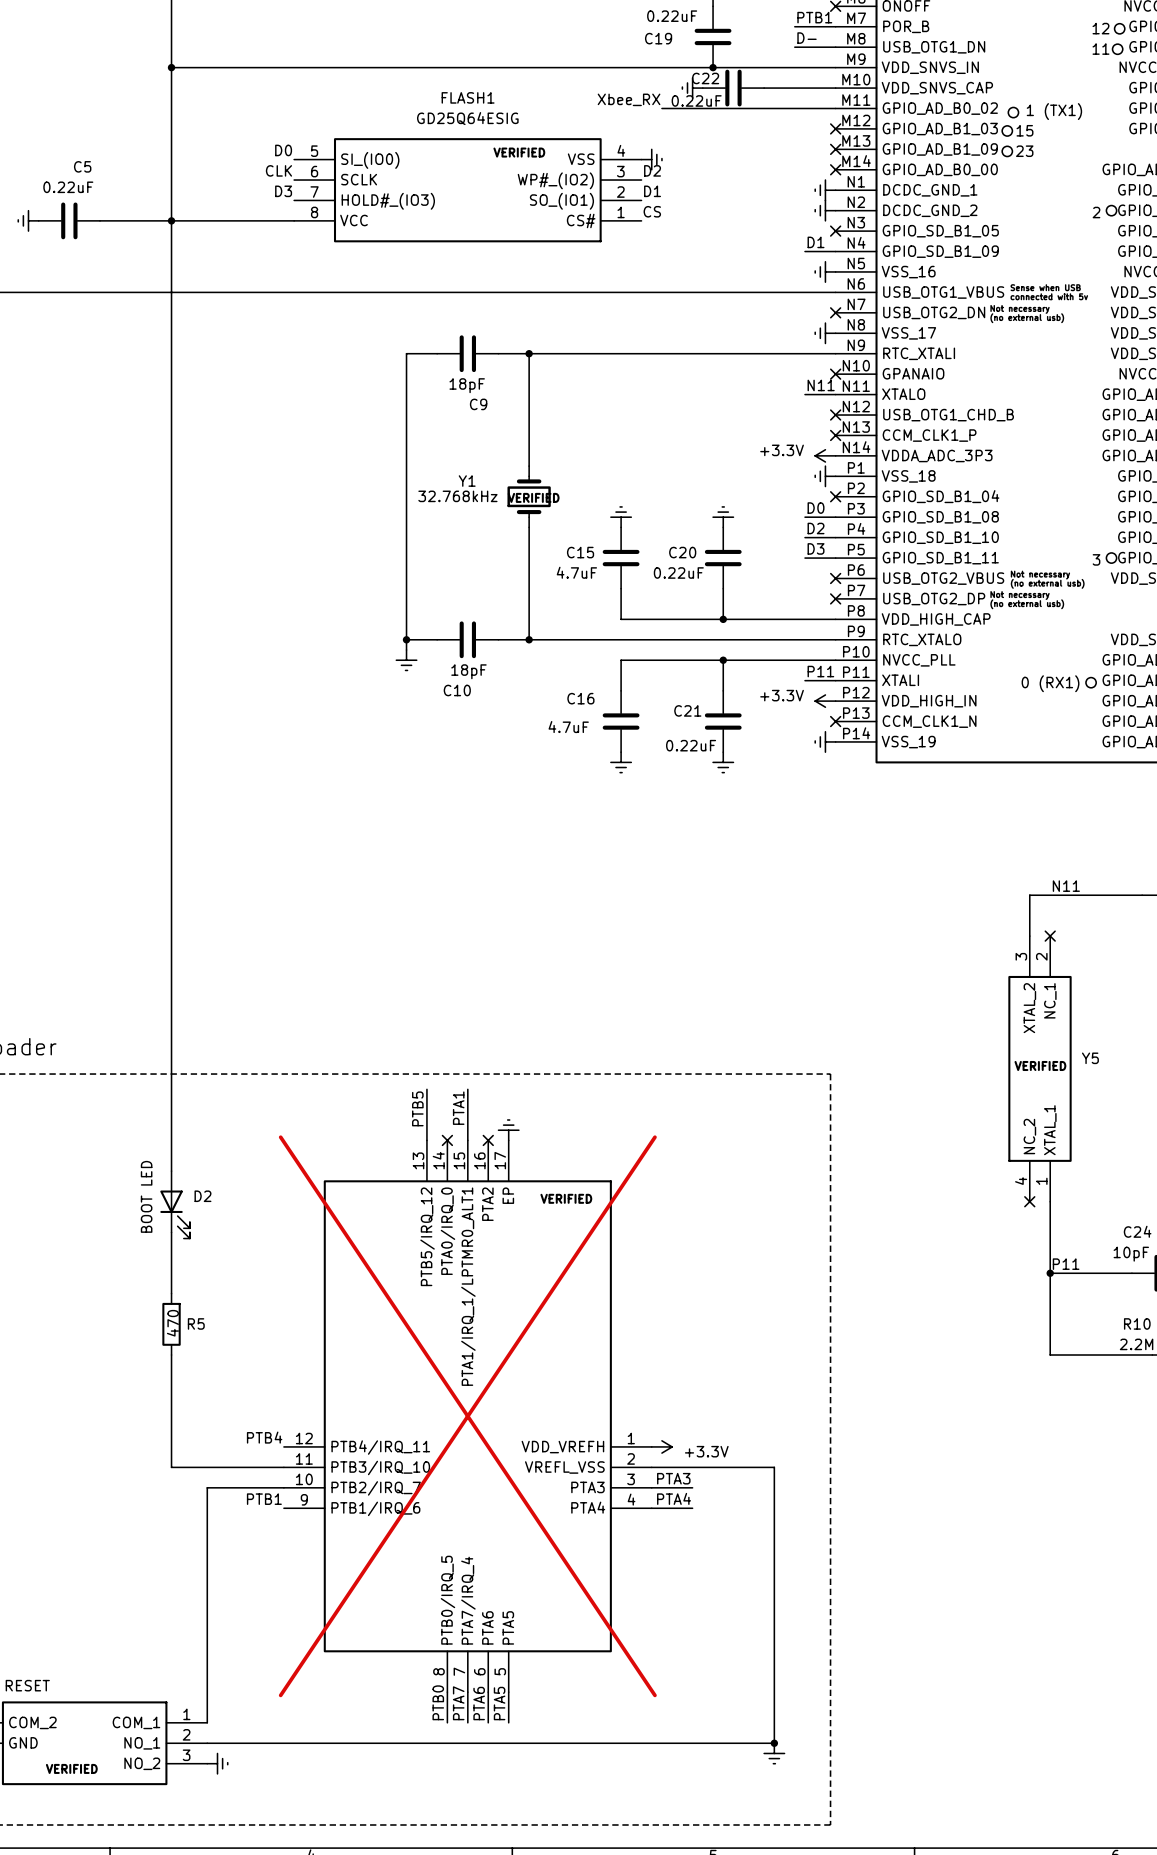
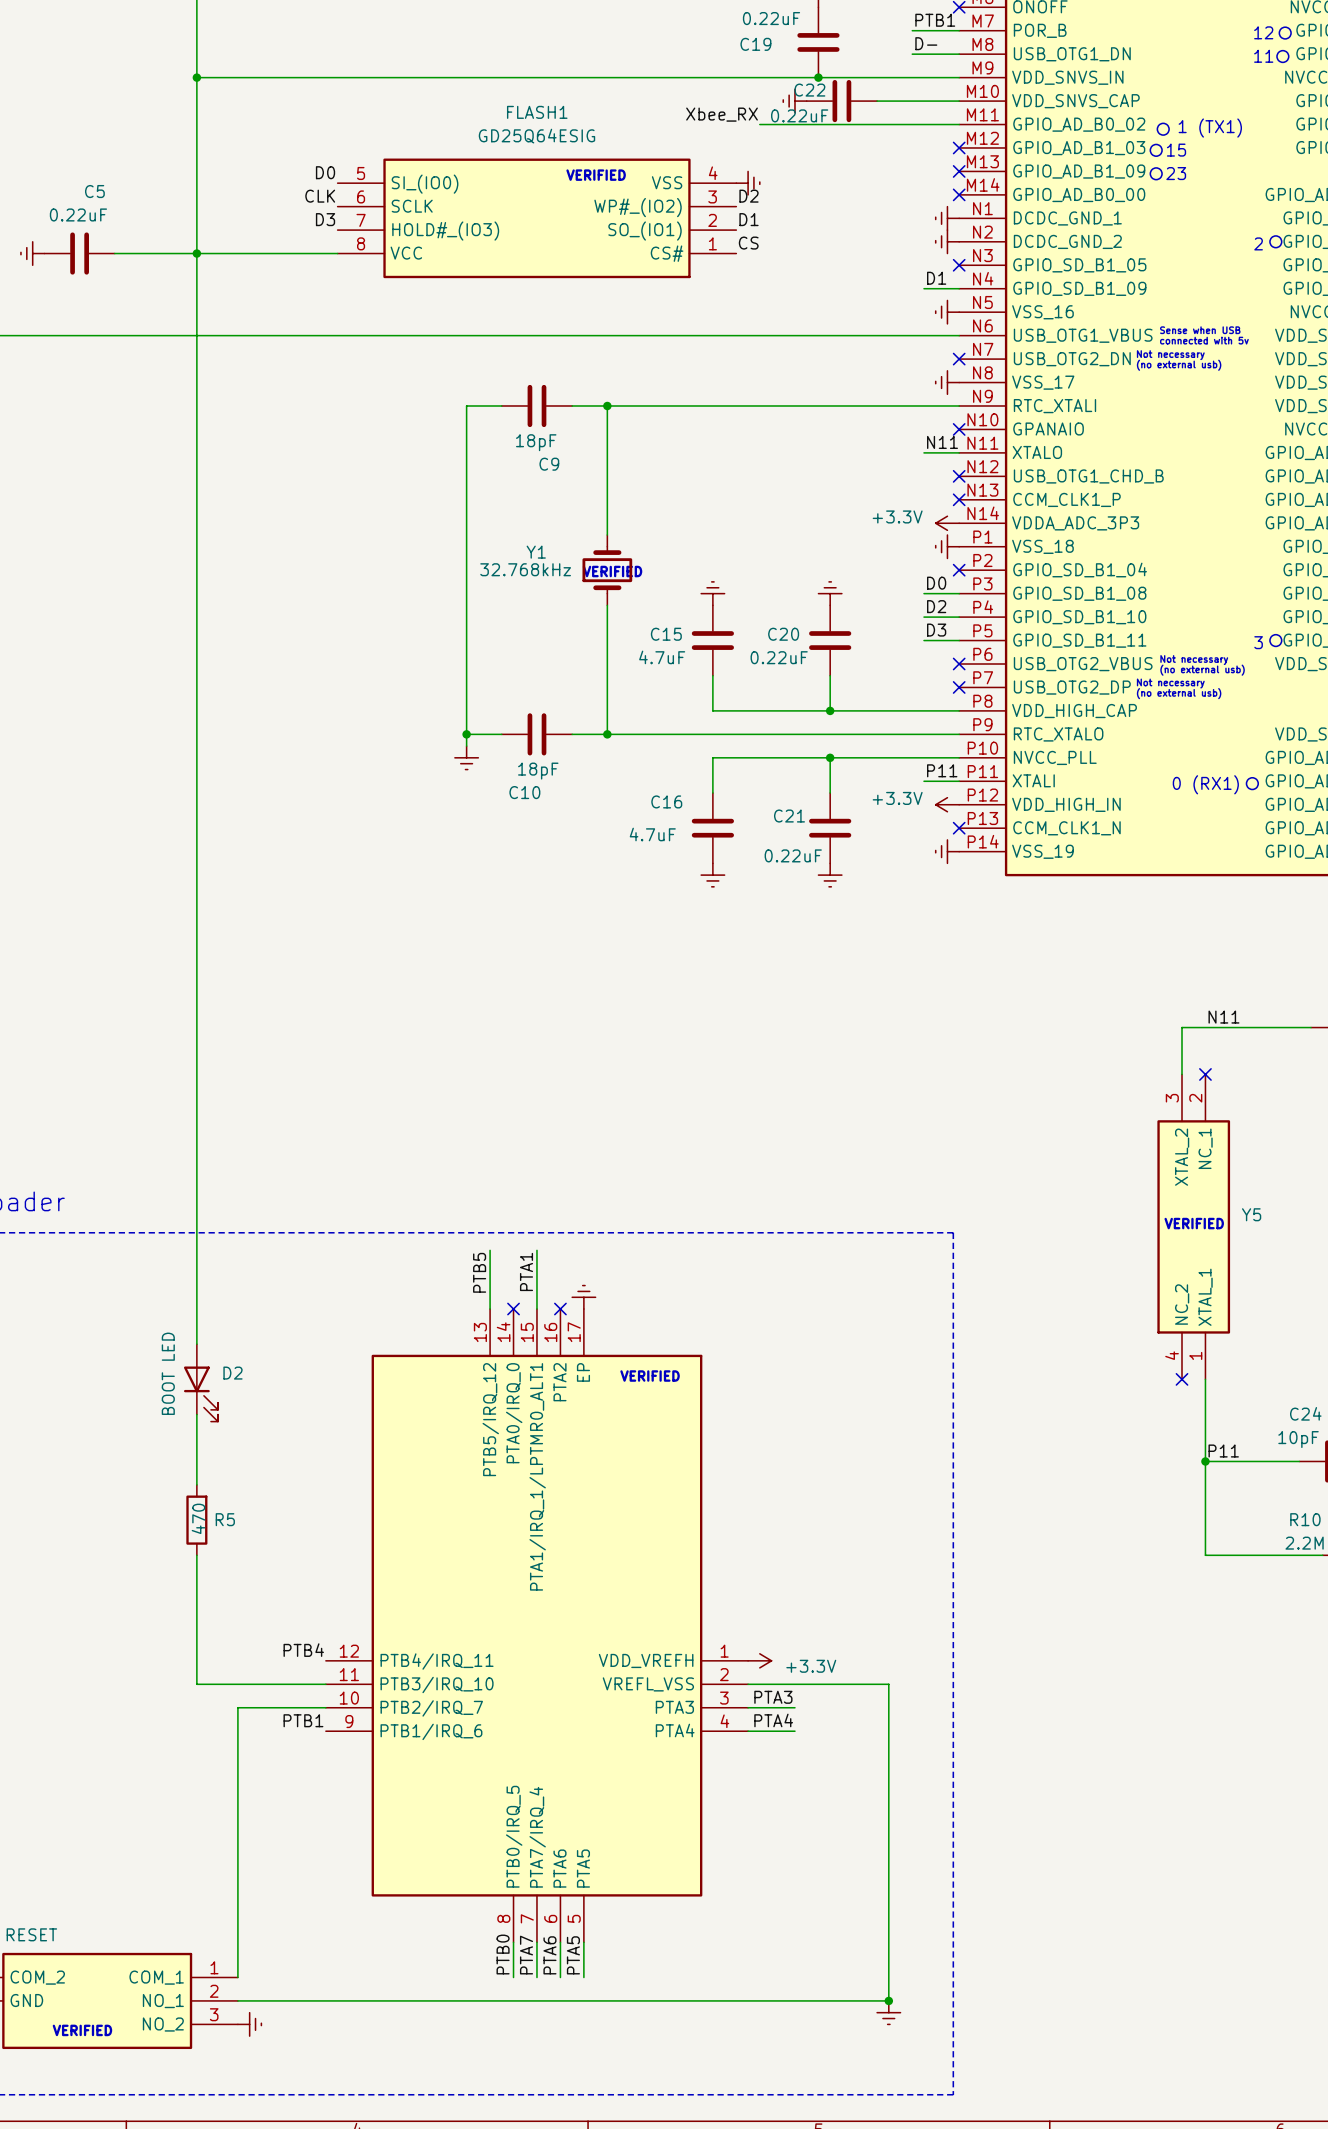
part do-not-place cross: (467, 1416) -> none

